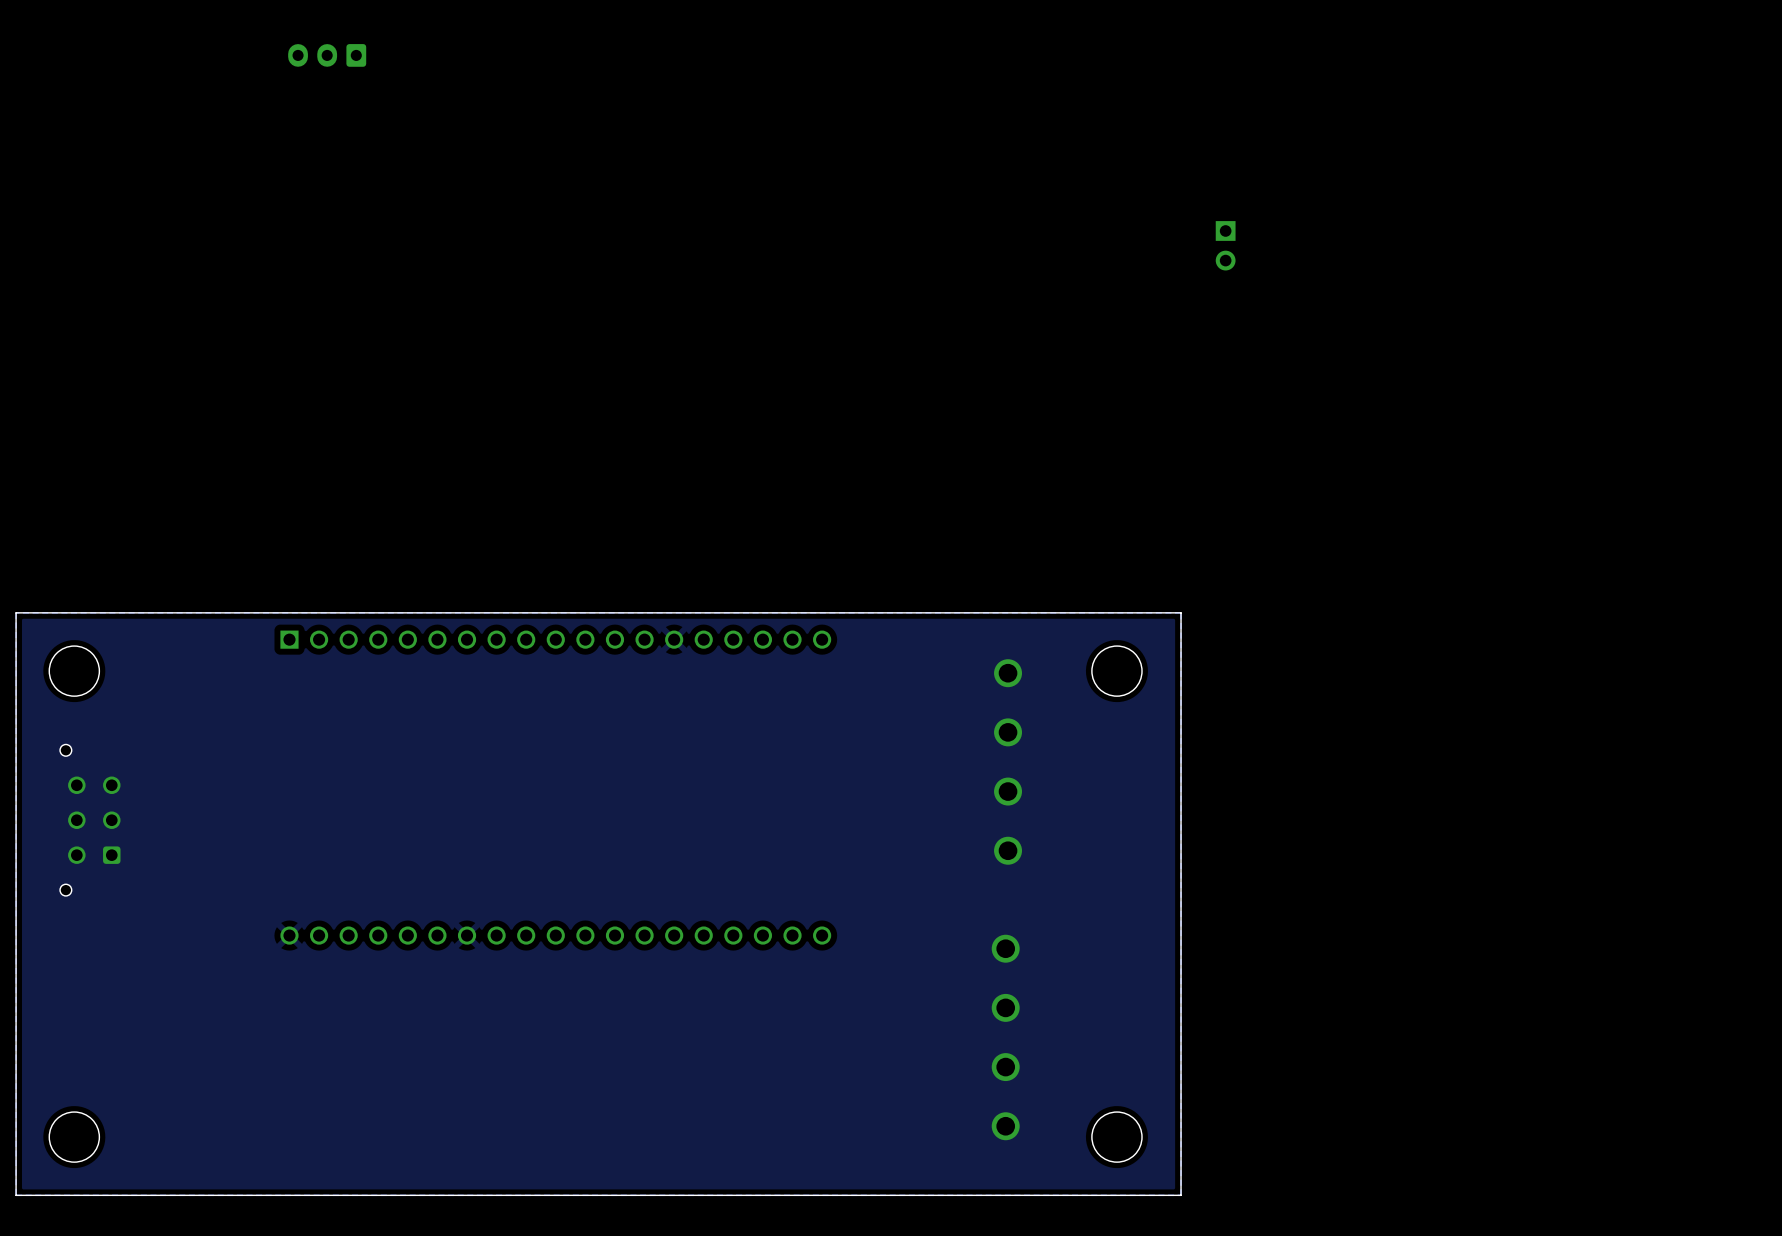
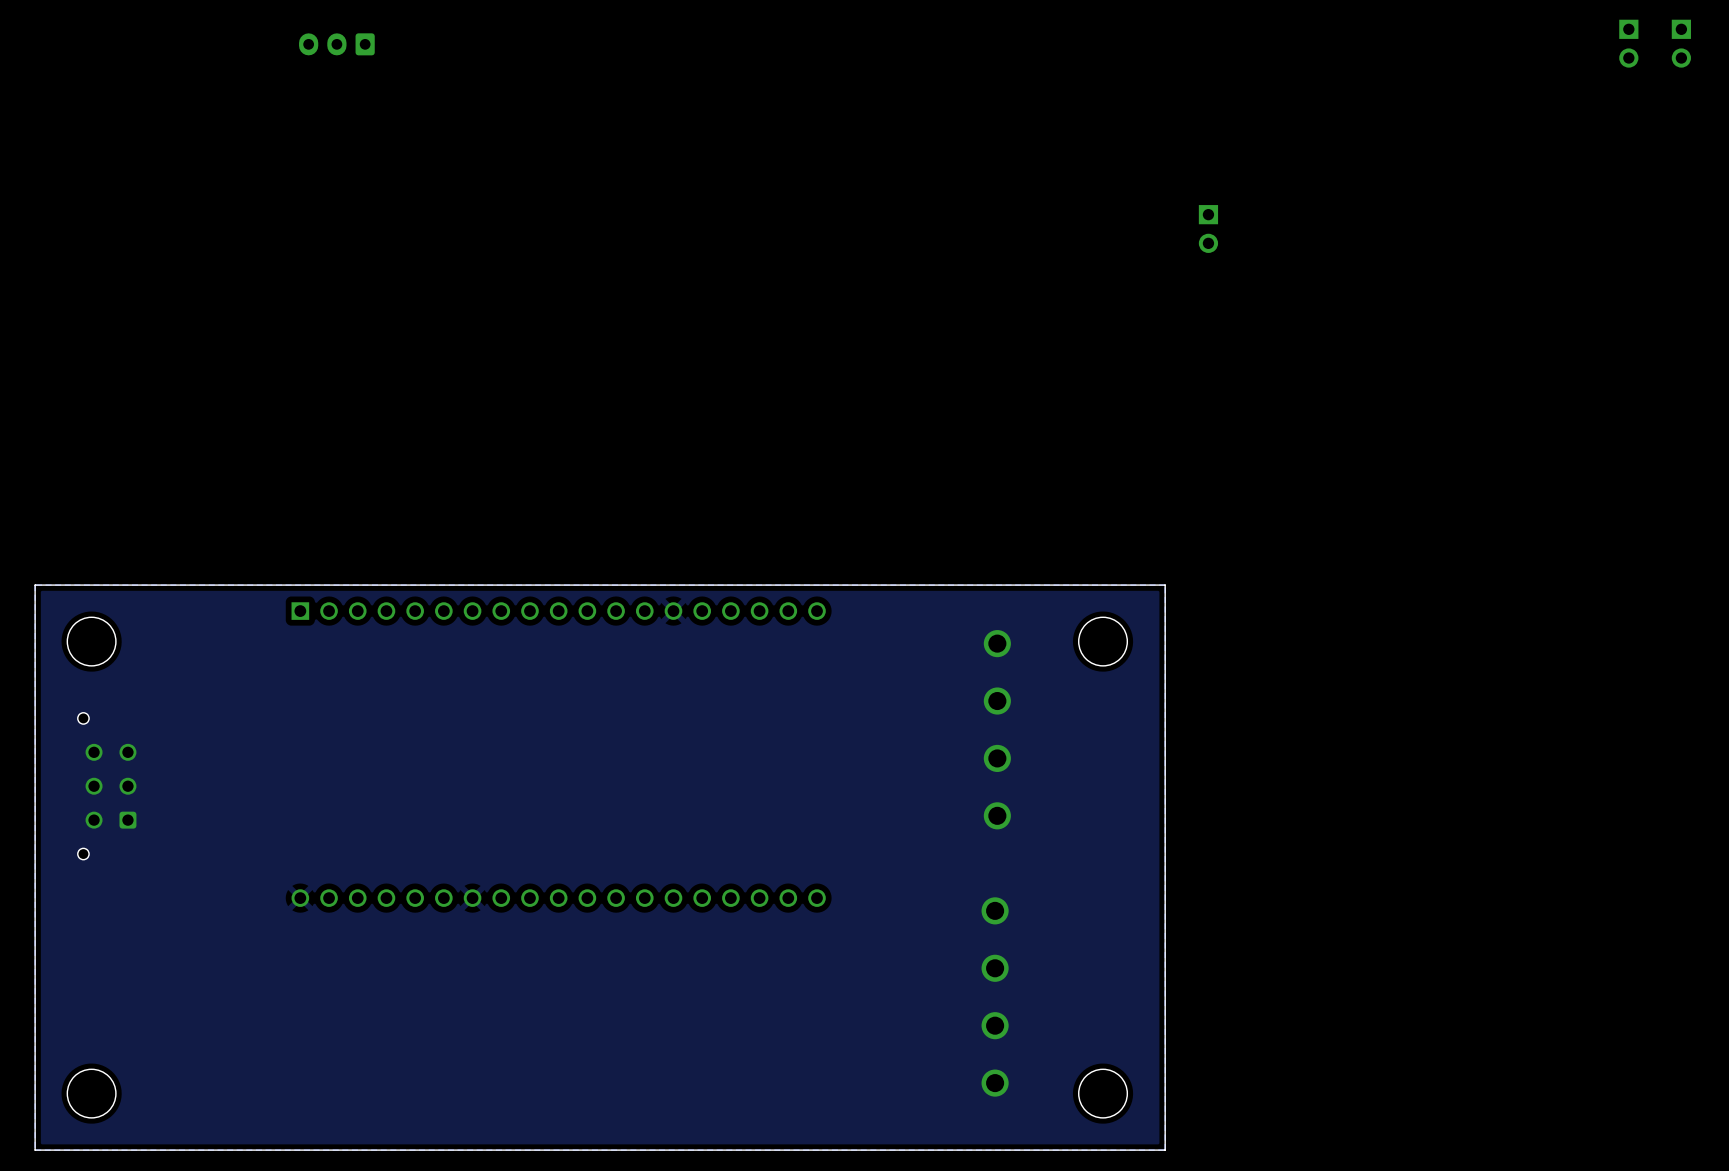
part: none -> (1628, 43)
part: none -> (1681, 43)

